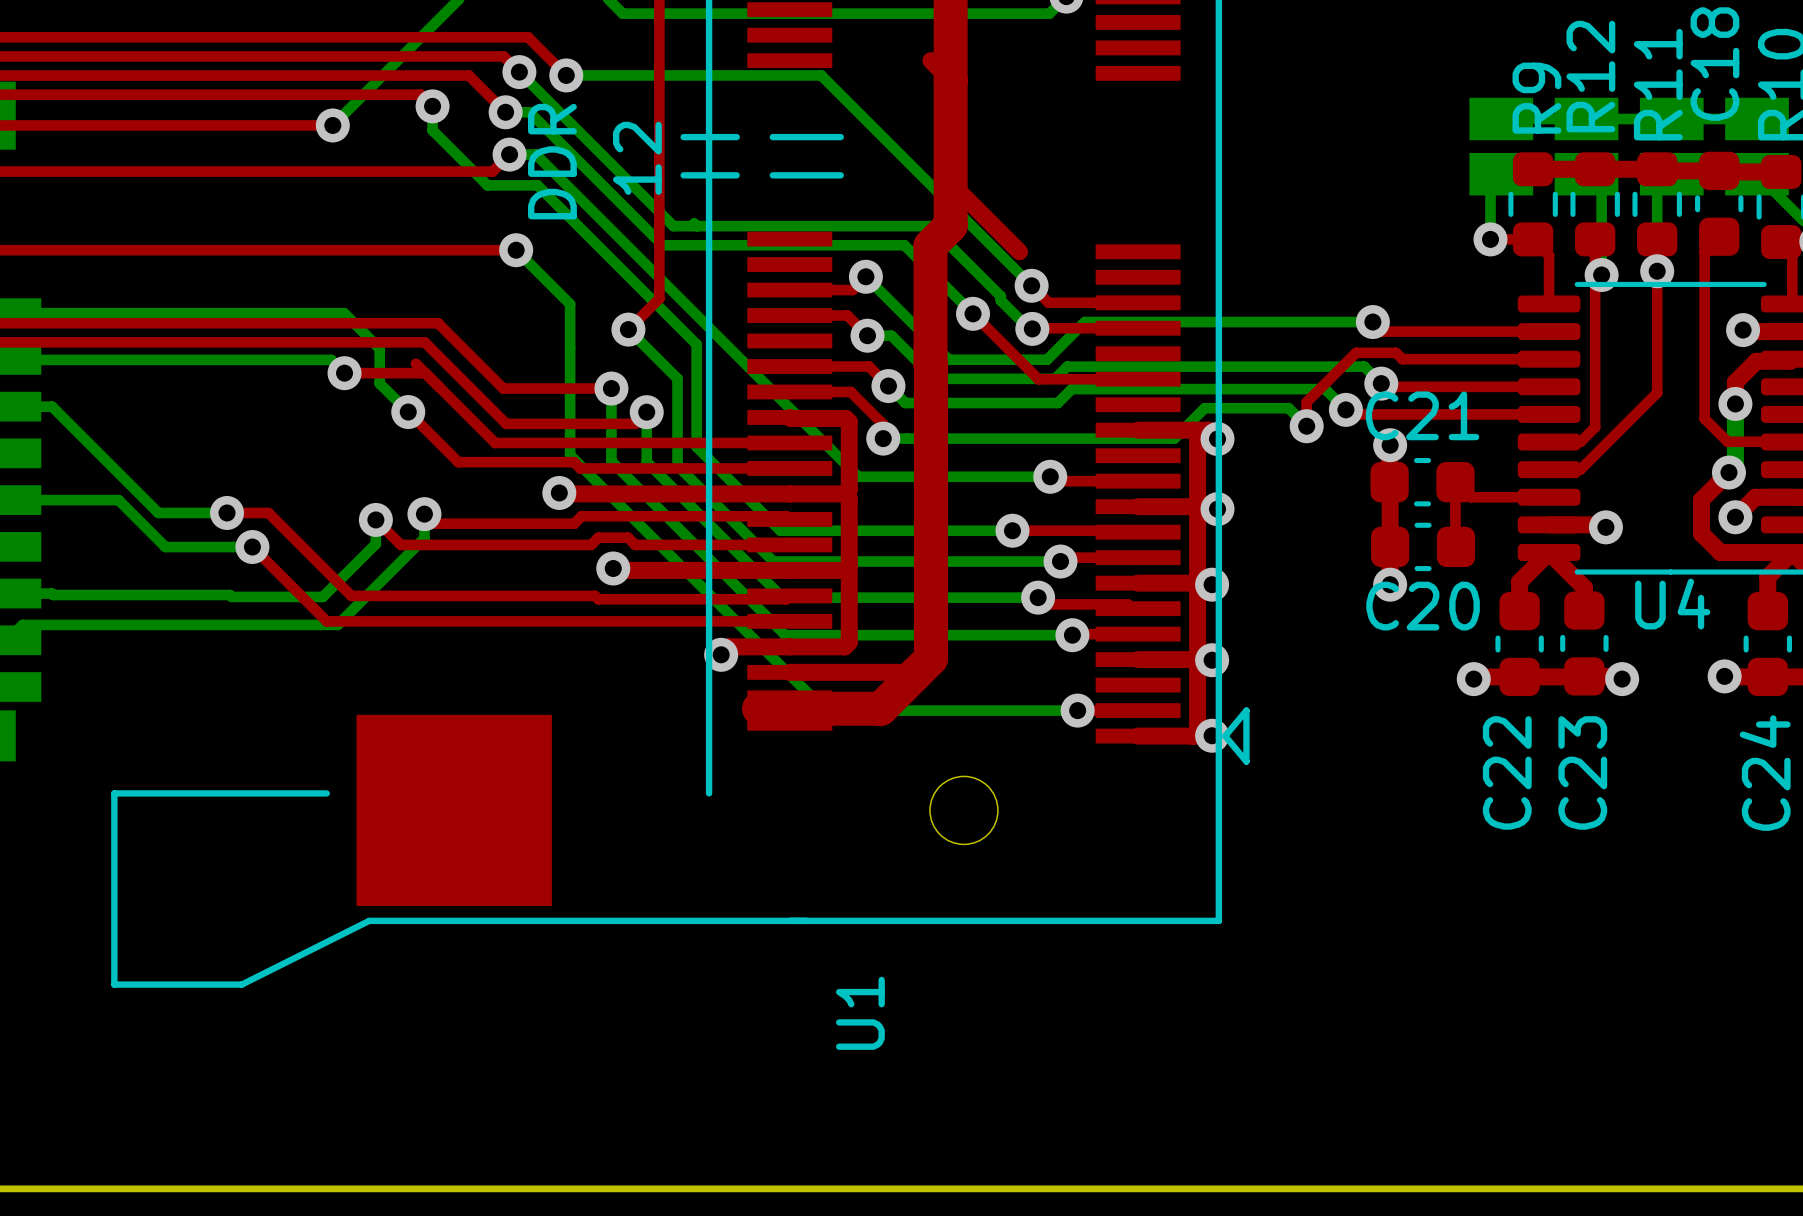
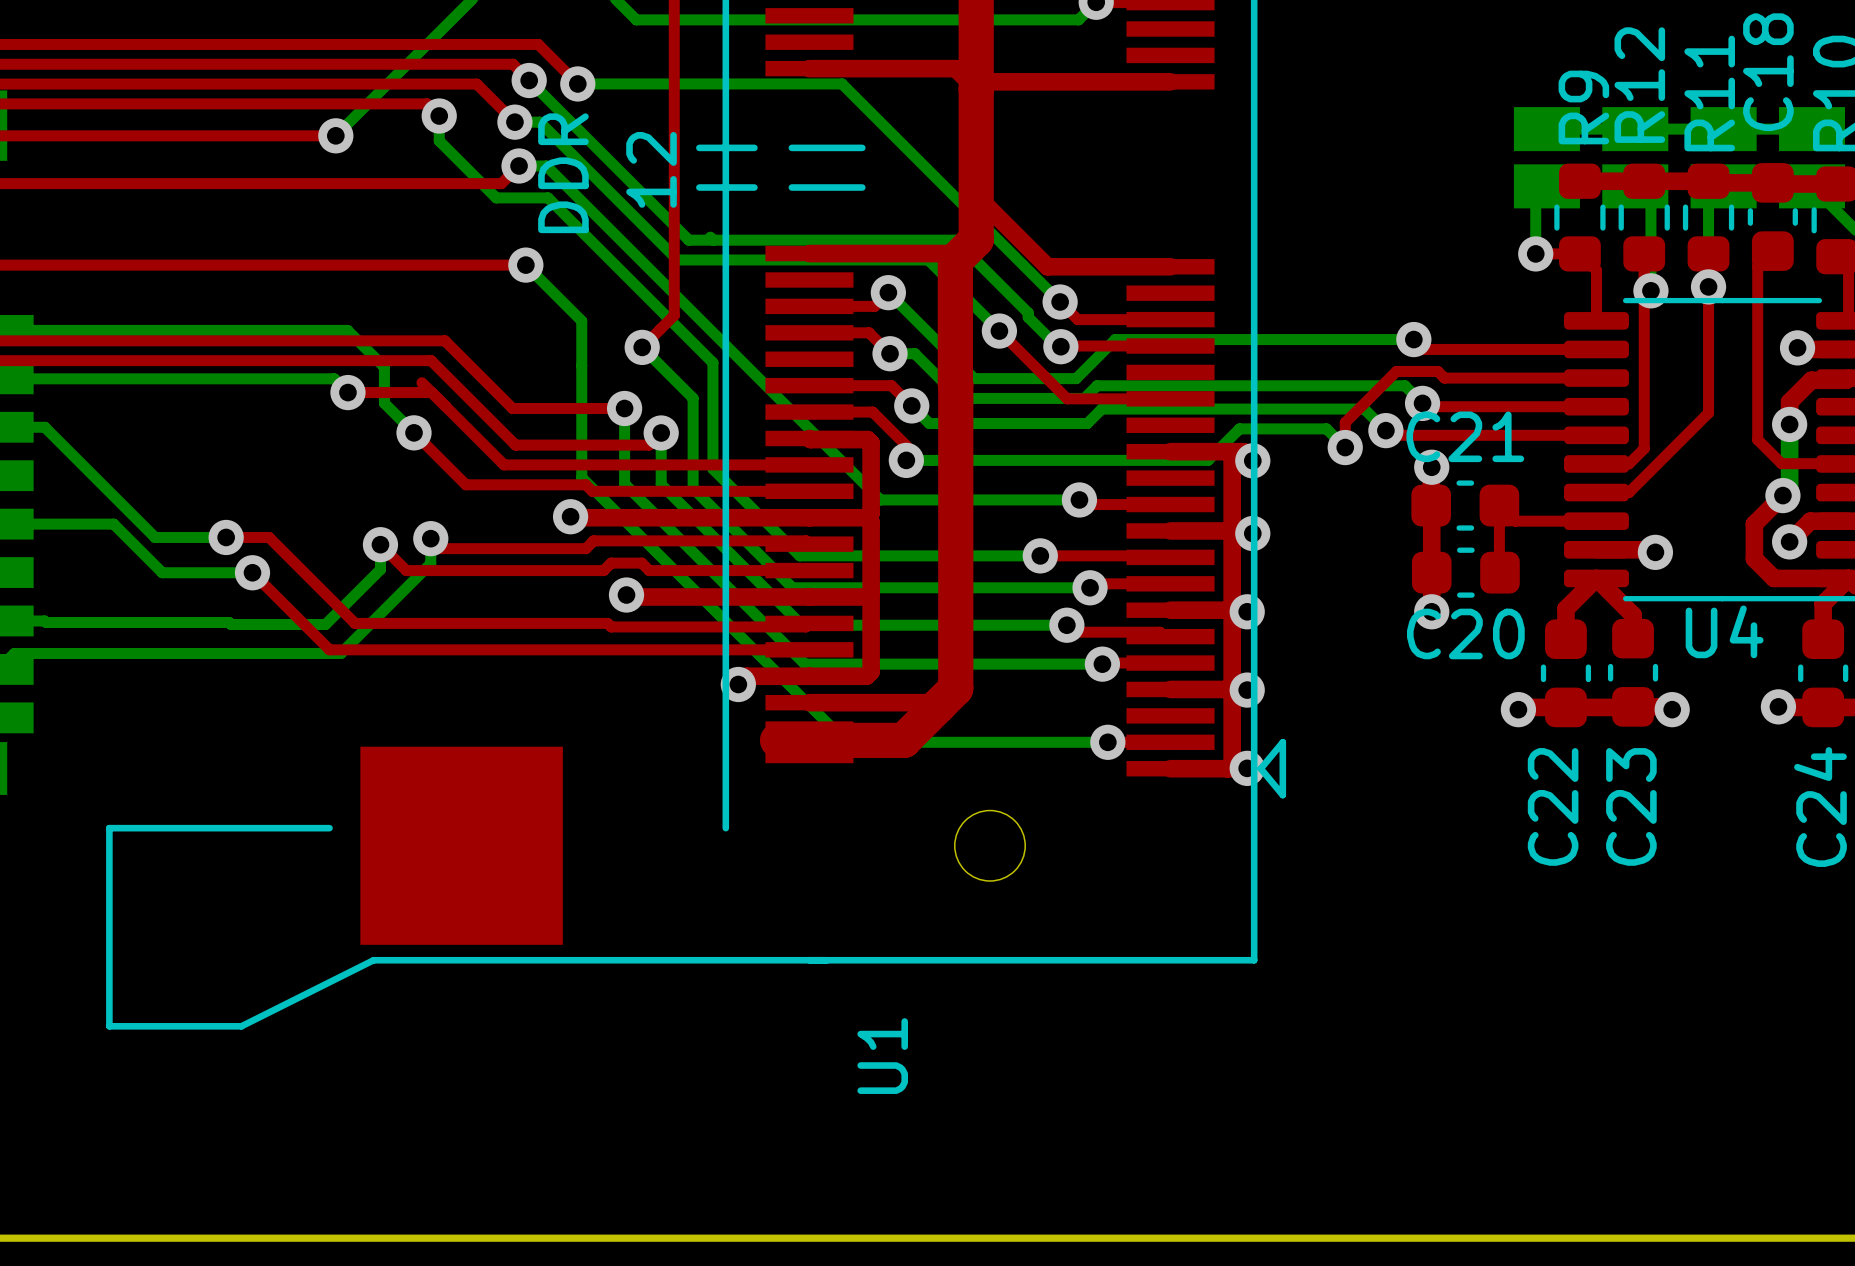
top track: none -> (809, 68) (955, 68)
top track: none -> (983, 81) (1170, 81)
top track: none -> (809, 253) (962, 253)
top track: none -> (1047, 266) (1170, 266)

